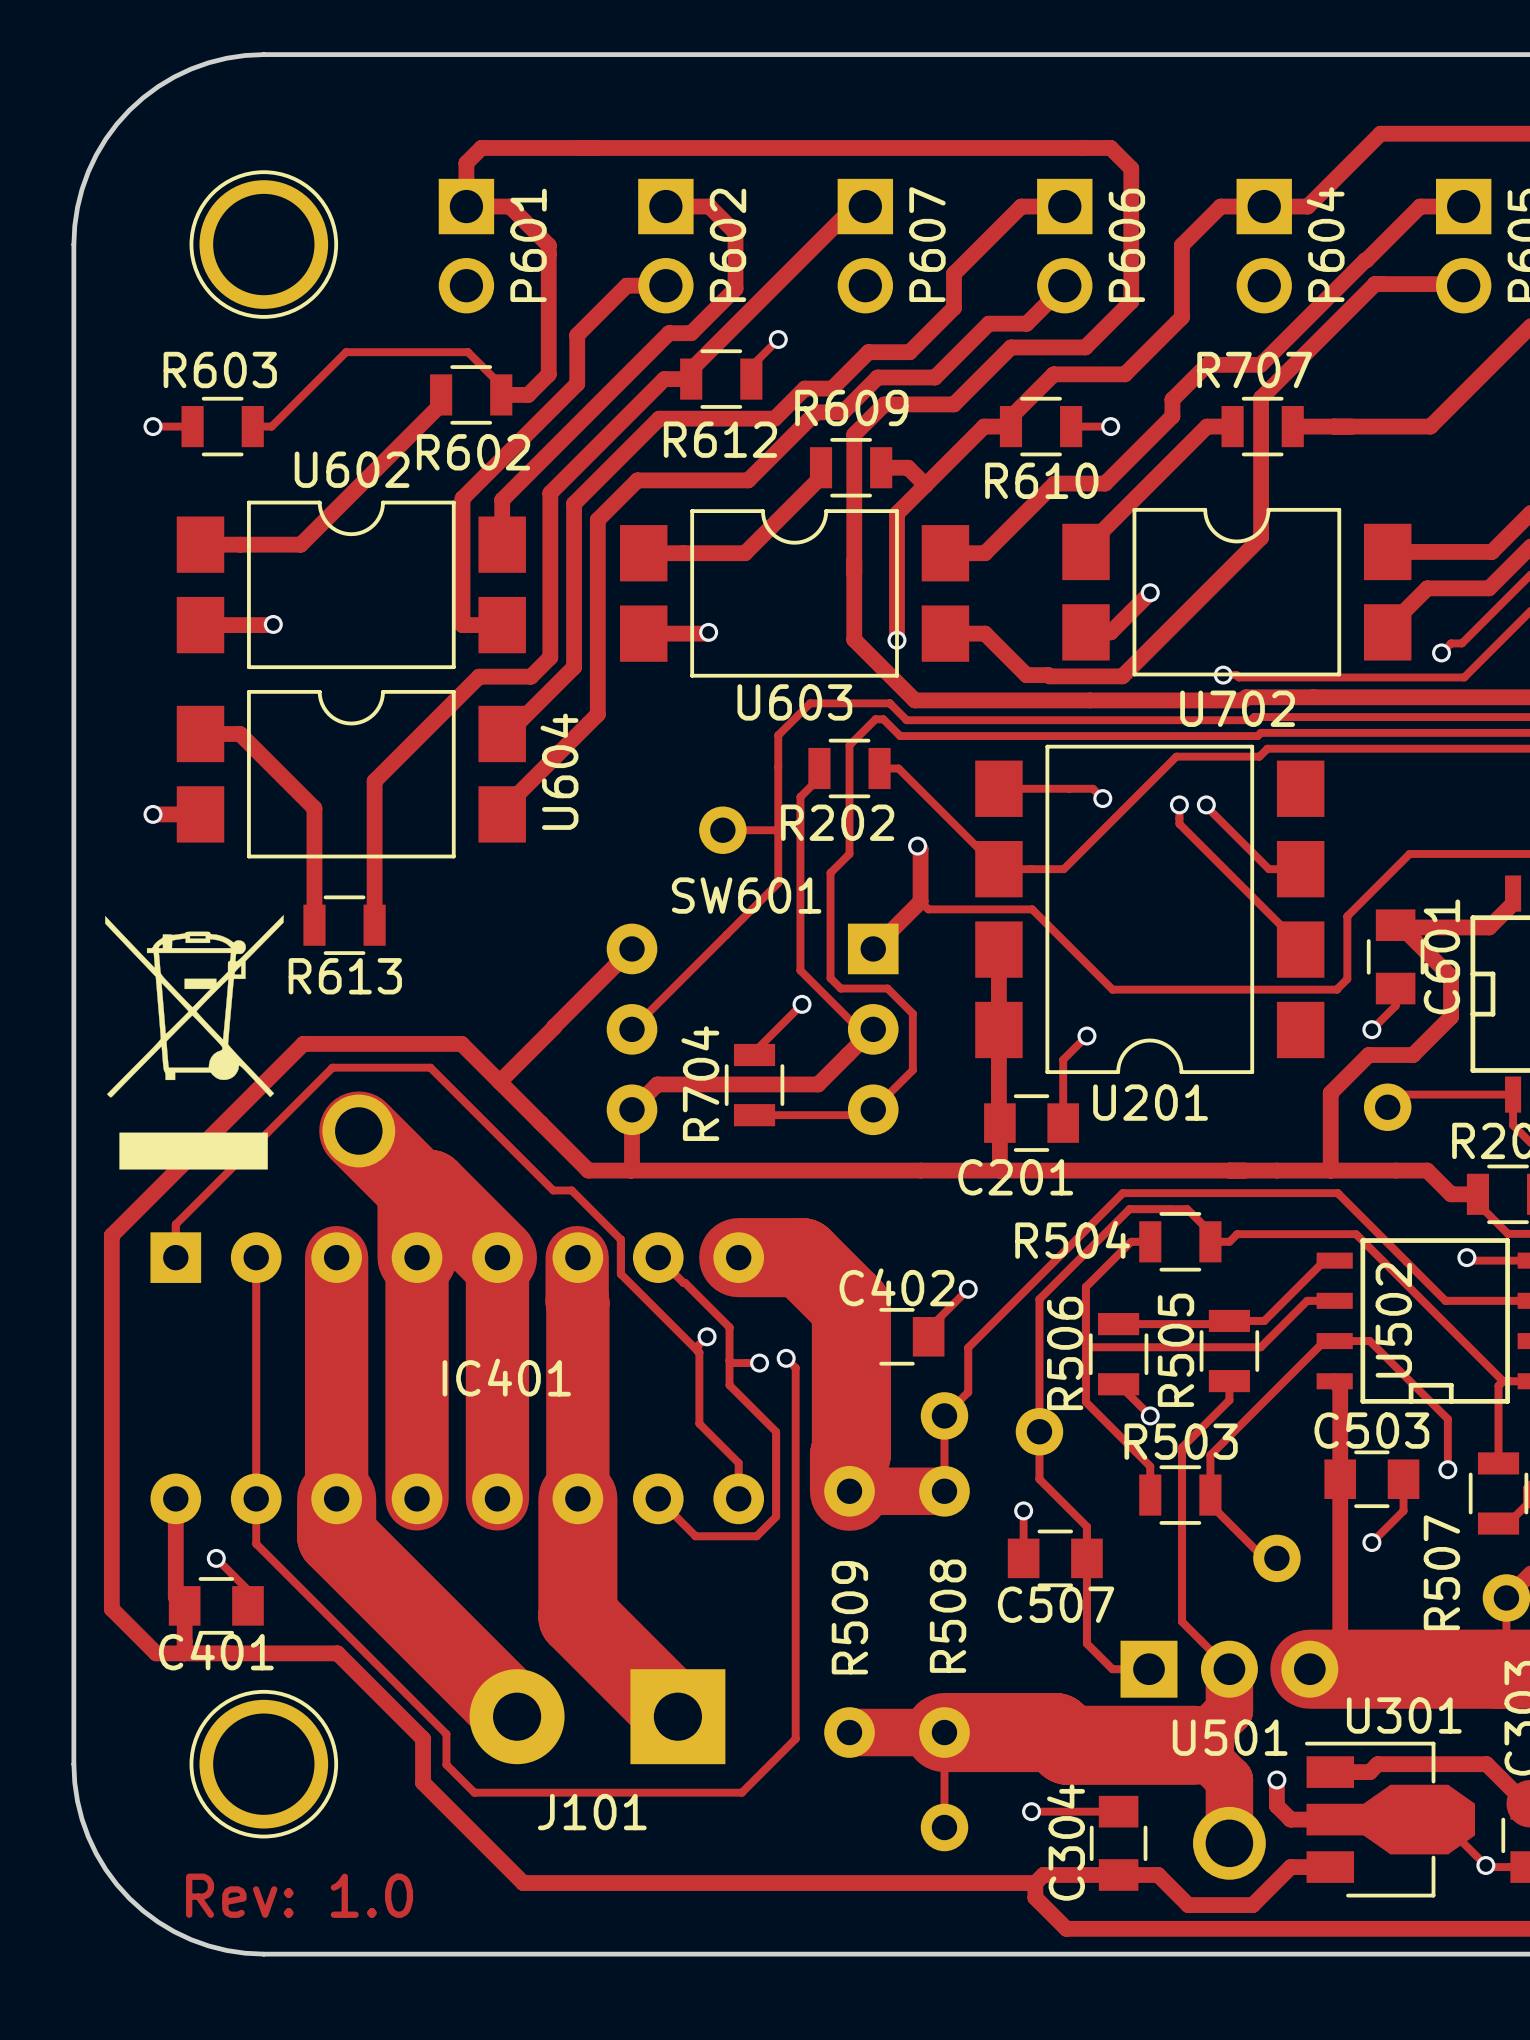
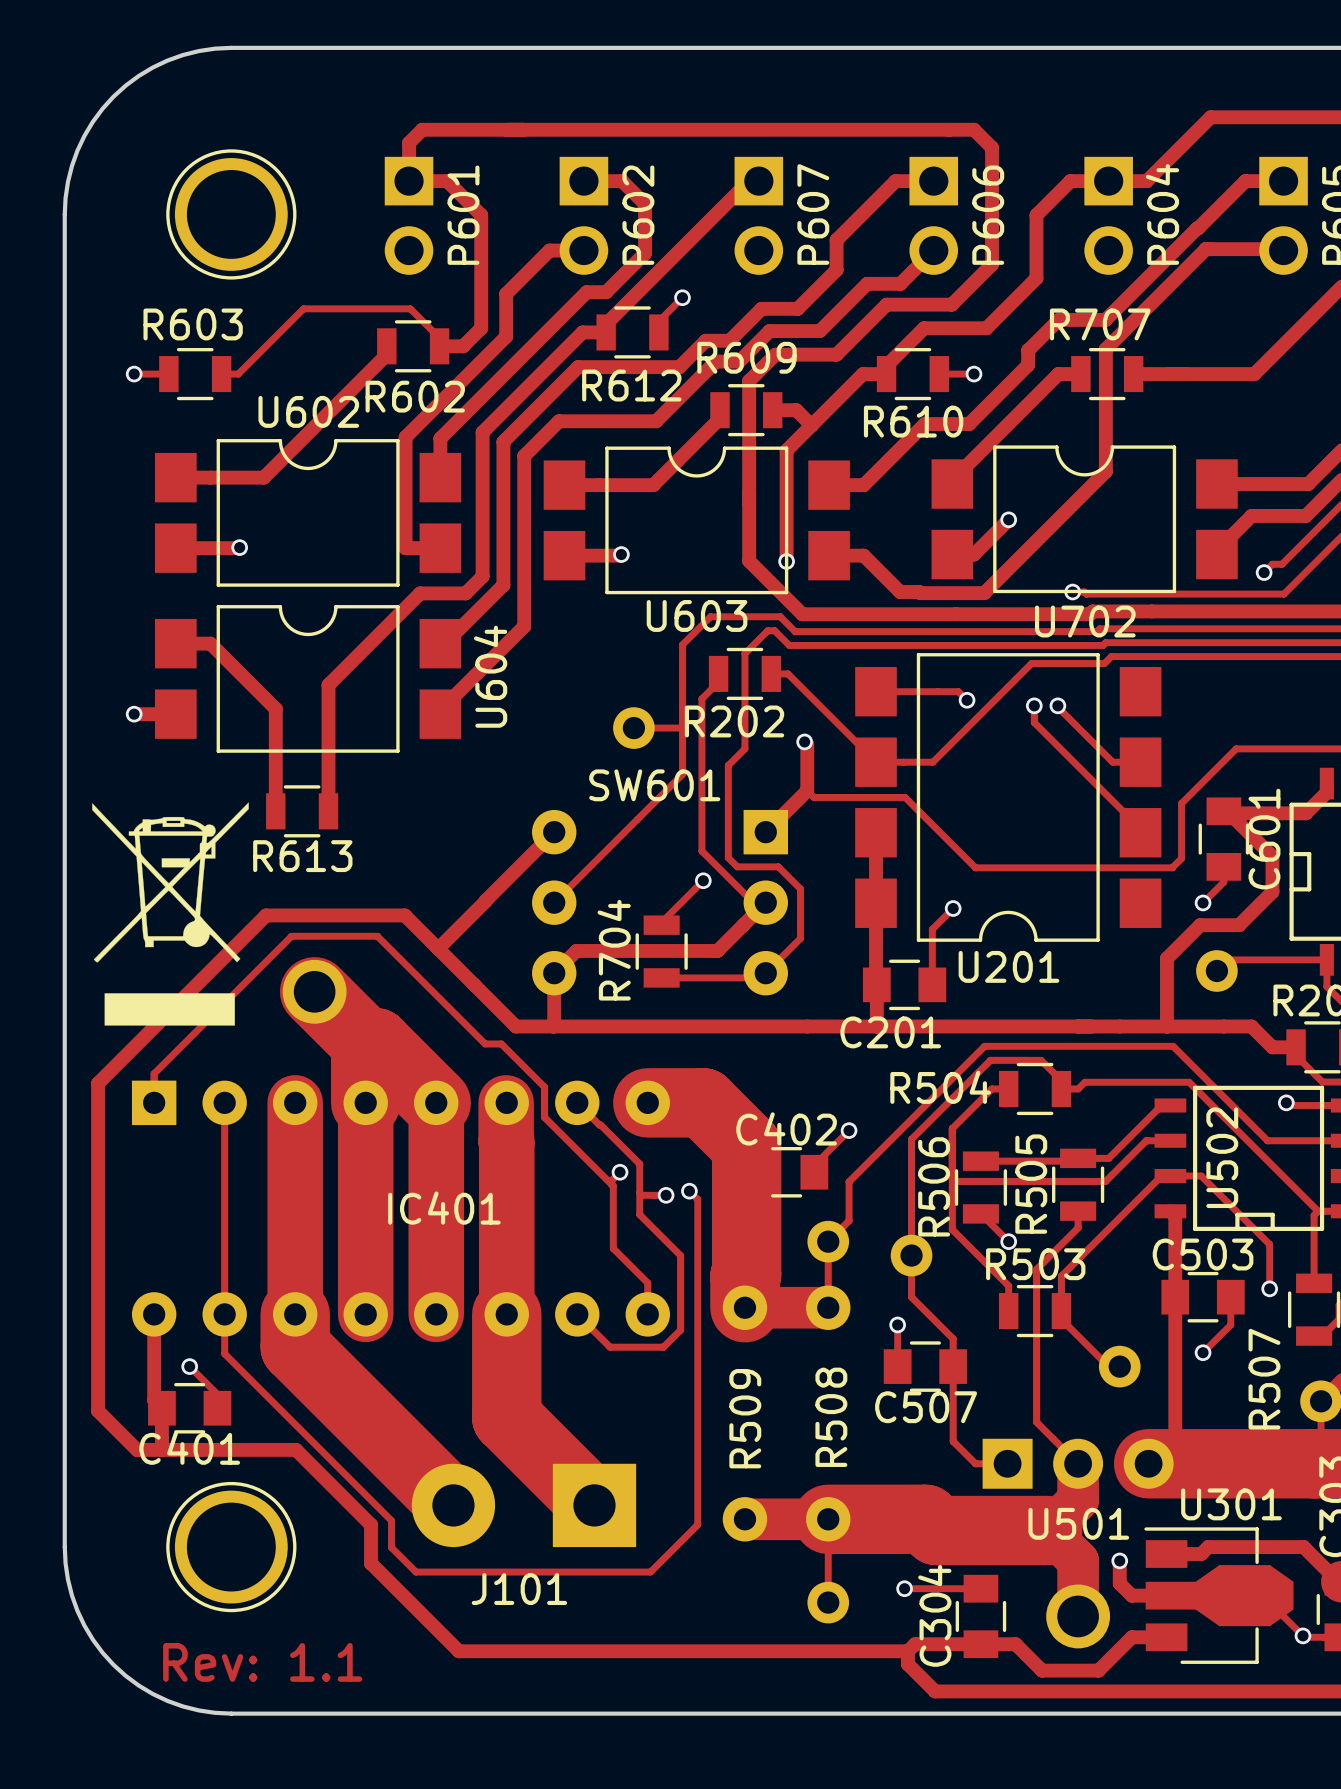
text: Rev: 1.0 (299, 1895) -> Rev: 1.1 (262, 1662)

